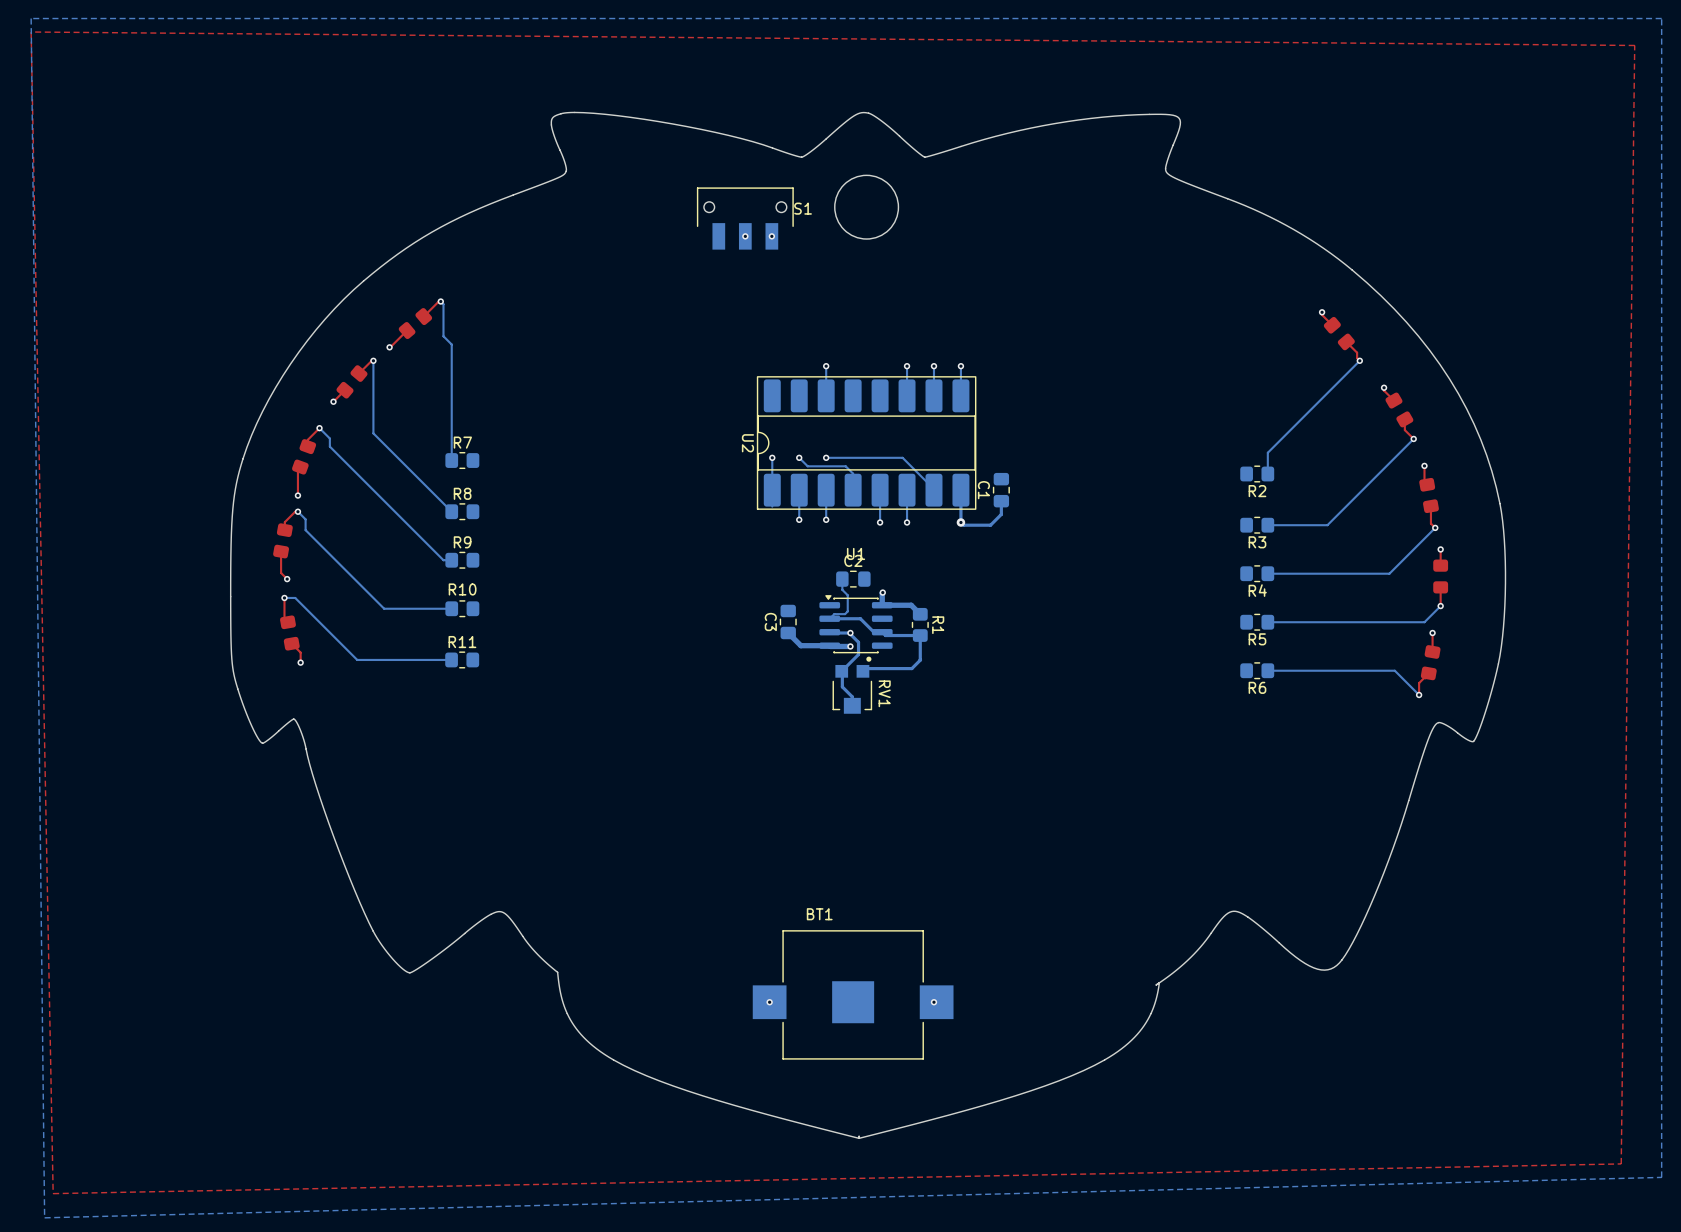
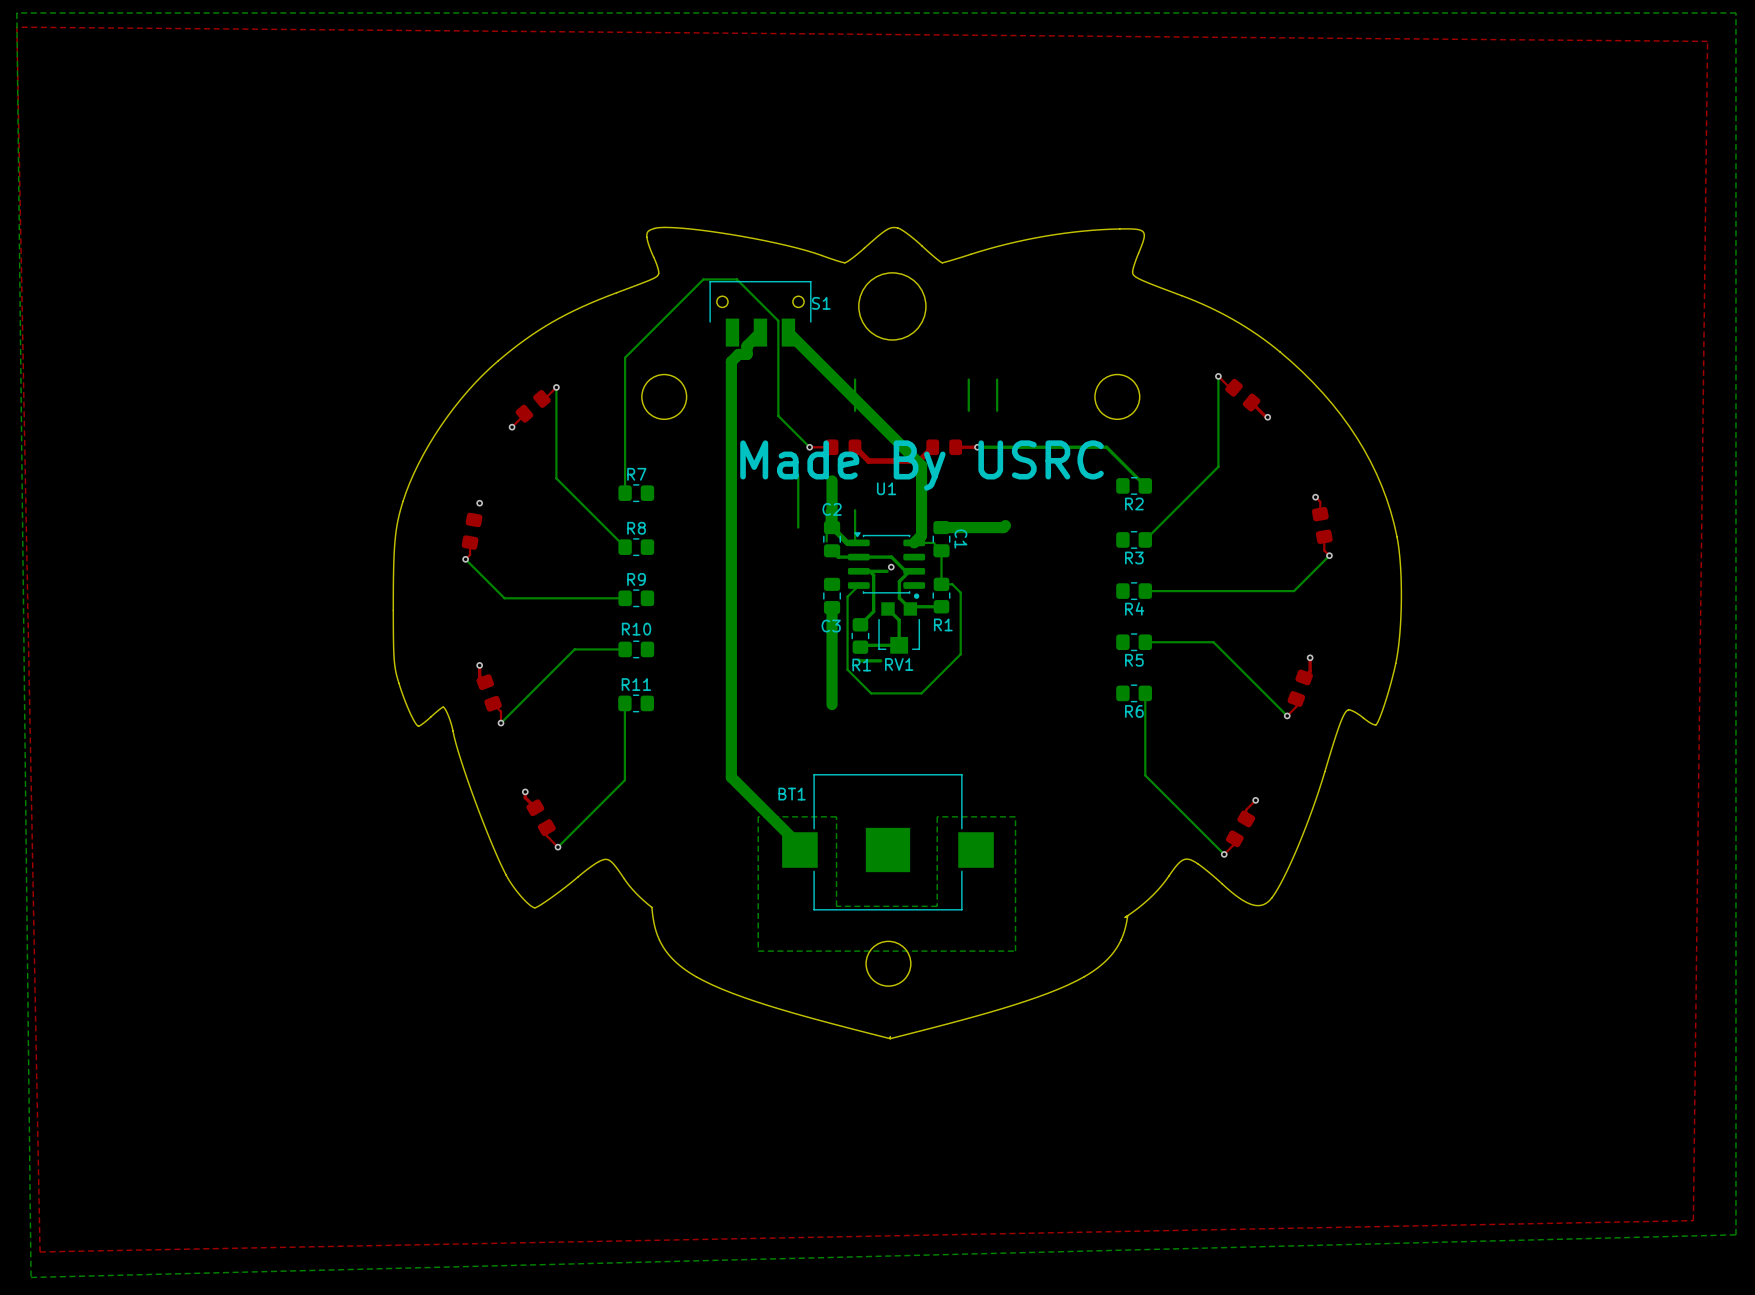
board edge: (574, 112) (617, 115) (687, 126) (741, 138) (801, 157) (849, 118) (861, 112) (869, 113) (879, 119) (924, 157) (995, 136) (1055, 123) (1114, 116) (1172, 115) (1179, 118) (1180, 124) (1166, 165) (1165, 170) (1168, 174) (1261, 212) (1309, 238) (1352, 270) (1406, 322) (1429, 350) (1458, 393) (1480, 439) (1491, 471) (1499, 503) (1504, 539) (1505, 594) (1502, 637) (1492, 688) (1475, 737) (1473, 741) (1469, 740) (1440, 722) (1434, 726) (1379, 884) (1352, 942) (1336, 965) (1324, 970) (1309, 965) (1295, 956) (1247, 917) (1237, 911) (1229, 912) (1221, 918) (1190, 957) (1156, 984) (1159, 982) (1154, 1004) (1146, 1022) (1131, 1040) (1109, 1057) (1071, 1075) (1015, 1095) (913, 1124) (859, 1138) (859, 1136) (858, 1138) (751, 1110) (687, 1090) (646, 1075) (608, 1057) (589, 1043) (576, 1028) (563, 1003) (557, 972) (533, 950) (510, 918) (503, 912) (496, 911) (485, 917) (435, 956) (410, 972) (404, 970) (392, 958) (373, 931) (349, 877) (319, 797) (303, 739) (296, 722) (292, 719) (261, 742) (251, 726) (239, 693) (232, 667) (230, 635) (231, 534) (236, 482) (246, 447) (268, 399) (298, 352) (334, 308) (380, 266) (432, 232) (479, 208) (564, 174) (565, 165) (553, 134) (551, 120) (558, 114) (574, 112) -> (665, 227) (698, 229) (754, 238) (796, 248) (844, 262) (882, 232) (892, 227) (898, 228) (906, 232) (942, 262) (998, 246) (1045, 236) (1092, 230) (1138, 229) (1143, 232) (1144, 237) (1133, 269) (1134, 276) (1208, 306) (1246, 327) (1280, 352) (1323, 393) (1341, 415) (1364, 449) (1381, 486) (1390, 511) (1397, 536) (1400, 565) (1401, 608) (1399, 642) (1391, 682) (1377, 721) (1375, 724) (1373, 724) (1350, 710) (1344, 713) (1301, 837) (1280, 883) (1267, 901) (1258, 905) (1246, 902) (1197, 863) (1189, 859) (1183, 859) (1152, 895) (1125, 917) (1127, 915) (1124, 932) (1117, 947) (1105, 961) (1088, 974) (1058, 989) (1013, 1005) (890, 1038) (754, 1001) (722, 989) (692, 974) (677, 963) (666, 951) (656, 931) (651, 907) (632, 889) (608, 860) (603, 859) (595, 863) (535, 907) (531, 905) (521, 896) (506, 874) (487, 832) (463, 769) (445, 709) (442, 707) (417, 725) (410, 712) (400, 687) (394, 666) (393, 640) (393, 561) (397, 520) (406, 492) (423, 454) (447, 416) (475, 382) (511, 349) (552, 322) (590, 303) (657, 276) (658, 269) (648, 244) (646, 233) (652, 229) (665, 227)
round board edge position: (866, 207) -> (892, 306)
S1 position: (745, 218) -> (760, 313)
via: (745, 236) -> none
via: (771, 236) -> none
top track: (440, 301) (423, 316) -> none
bottom track: (440, 301) (443, 304) (443, 336) (451, 344) (451, 460) -> none
via: (440, 301) -> none
top track: (1322, 312) (1322, 315) (1332, 325) -> none
via: (1322, 312) -> none
bottom track: none -> (760, 332) (747, 346) (747, 354) (738, 354) (731, 361) (731, 777) (799, 845) (799, 850)
bottom track: none -> (788, 332) (921, 465) (921, 535) (914, 542) (933, 542) (941, 550) (941, 584) (952, 584) (960, 592) (960, 654) (921, 693) (871, 693) (847, 669) (847, 596) (858, 585) (863, 585)
part position: (415, 323) -> (533, 406)
top track: (407, 330) (389, 347) -> none
part: (1339, 333) -> none
top track: (1346, 341) (1357, 352) (1357, 358) (1359, 360) -> none
via: (389, 347) -> none
top track: (373, 360) (358, 373) -> none
bottom track: (373, 360) (373, 433) (451, 511) -> none
via: (373, 360) -> none
bottom track: (1359, 360) (1267, 452) (1267, 473) -> none
via: (1359, 360) -> none
round board edge: none -> [641, 374, 687, 420]
round board edge: none -> [1094, 374, 1140, 420]
top track: none -> (1218, 376) (1229, 387) (1234, 387)
bottom track: none -> (1218, 376) (1218, 466) (1145, 539)
via: none -> (1218, 376)
via: (826, 366) -> none
bottom track: (907, 366) (907, 379) -> none
via: (907, 366) -> none
via: (933, 366) -> none
via: (960, 366) -> none
top track: none -> (556, 387) (544, 398) (541, 398)
bottom track: none -> (556, 387) (556, 478) (625, 547)
via: none -> (556, 387)
part: none -> (1242, 395)
part: (351, 381) -> none
top track: none -> (1251, 402) (1267, 417)
top track: (1384, 387) (1384, 390) (1393, 400) -> none
via: (1384, 387) -> none
top track: (345, 390) (333, 401) -> none
top track: none -> (524, 413) (512, 427)
via: (333, 401) -> none
via: none -> (1267, 417)
part: (1399, 409) -> none
via: none -> (512, 427)
top track: (1404, 419) (1404, 430) (1413, 438) -> none
top track: (319, 428) (307, 439) (307, 446) -> none
bottom track: (319, 428) (329, 438) (329, 446) (443, 560) (451, 560) -> none
via: (319, 428) -> none
bottom track: none -> (809, 447) (778, 415) (778, 320) (736, 279) (703, 279) (625, 357) (625, 493)
via: none -> (809, 447)
top track: none -> (832, 447) (809, 447)
part: none -> (843, 447)
top track: none -> (932, 447) (918, 461) (868, 461) (854, 447)
part: none -> (944, 447)
top track: none -> (977, 447) (955, 447)
bottom track: none -> (977, 447) (1106, 447) (1145, 485)
via: none -> (977, 447)
bottom track: (1413, 438) (1327, 525) (1267, 525) -> none
via: (1413, 438) -> none
U2: (866, 443) -> none
text: none -> Made By USRC (922, 465)
part: (304, 456) -> none
via: (772, 457) -> none
bottom track: (799, 457) (807, 466) (845, 466) (853, 473) (853, 490) -> none
via: (799, 457) -> none
bottom track: (826, 457) (902, 457) (933, 490) -> none
via: (826, 457) -> none
R7 position: (462, 460) -> (636, 493)
bottom track: none -> (832, 480) (832, 527) (847, 542) (858, 542)
top track: (1424, 465) (1424, 482) (1427, 484) -> none
via: (1424, 465) -> none
top track: (300, 467) (297, 469) (297, 495) -> none
R2 position: (1257, 473) -> (1134, 485)
top track: none -> (1315, 497) (1320, 501) (1320, 514)
via: none -> (1315, 497)
via: none -> (479, 503)
bottom track: (960, 490) (960, 522) (963, 525) (990, 525) (1001, 514) (1001, 501) -> none
C1 name position: C1 (983, 490) -> C1 (960, 538)
C1 position: (1001, 490) -> (941, 539)
via: (297, 495) -> none
part position: (1429, 495) -> (1322, 525)
bottom track: none -> (1005, 525) (1003, 527) (941, 527)
bottom track: (880, 506) (880, 522) -> none
bottom track: (907, 506) (907, 522) -> none
top track: (1430, 506) (1430, 523) (1435, 527) -> none
top track: (297, 511) (295, 511) (284, 522) (284, 530) -> none
bottom track: (297, 511) (305, 519) (305, 530) (384, 608) (451, 608) -> none
via: (297, 511) -> none
R8 position: (462, 511) -> (636, 547)
top track: none -> (1324, 536) (1324, 550) (1329, 555)
via: (799, 519) -> none
via: (826, 519) -> none
top track: none -> (470, 542) (470, 554) (465, 559)
via: (880, 522) -> none
via: (907, 522) -> none
via: (960, 522) -> none
R3 position: (1257, 525) -> (1134, 539)
bottom track: (1435, 527) (1389, 573) (1267, 573) -> none
via: (1435, 527) -> none
bottom track: none -> (832, 550) (838, 557) (891, 557) (905, 571) (914, 571)
bottom track: none -> (1329, 555) (1294, 591) (1145, 591)
via: none -> (1329, 555)
bottom track: none -> (465, 559) (504, 598) (625, 598)
via: none -> (465, 559)
part position: (282, 540) -> (472, 531)
via: none -> (891, 567)
bottom track: none -> (869, 571) (873, 575) (873, 611) (860, 624)
bottom track: none -> (887, 571) (858, 571)
bottom track: none -> (909, 571) (899, 581) (899, 598) (910, 608) (912, 606) (941, 606)
top track: (1440, 549) (1440, 565) -> none
via: (1440, 549) -> none
top track: (281, 551) (281, 573) (287, 579) -> none
R9 position: (462, 560) -> (636, 598)
R1: none -> (941, 595)
R4 position: (1257, 573) -> (1134, 591)
part: (1440, 576) -> none
via: (287, 579) -> none
bottom track: (842, 579) (842, 589) (847, 595) (847, 611) (845, 614) (834, 614) (829, 618) (860, 618) (873, 632) (882, 632) (885, 635) (920, 635) (920, 659) (911, 668) (869, 668) -> none
C2 rotation: 0° (853, 579) -> 90° clockwise (832, 539)
C2 position: (853, 579) -> (832, 539)
bottom track: none -> (832, 607) (832, 704)
bottom track: none -> (887, 608) (899, 620) (899, 645) (862, 645) (860, 647)
top track: (1440, 587) (1440, 606) -> none
bottom track: (882, 592) (882, 605) (911, 605) (920, 614) -> none
via: (882, 592) -> none
top track: (284, 597) (284, 618) (287, 622) -> none
bottom track: (284, 597) (295, 597) (357, 659) (451, 659) -> none
via: (284, 597) -> none
bottom track: (1440, 606) (1424, 622) (1267, 622) -> none
via: (1440, 606) -> none
R10 position: (462, 608) -> (636, 649)
R1: none -> (860, 635)
bottom track: none -> (1145, 642) (1213, 642) (1287, 715)
C3 name rotation: 0° (770, 621) -> 90° counterclockwise (831, 626)
C3 name position: C3 (770, 621) -> C3 (831, 626)
C3 position: (788, 621) -> (832, 595)
bottom track: none -> (625, 649) (574, 649) (501, 723)
R5 position: (1257, 622) -> (1134, 642)
U1 position: (856, 624) -> (886, 562)
R1: (920, 624) -> none
top track: none -> (1310, 657) (1310, 671) (1304, 677)
via: none -> (1310, 657)
part: (289, 633) -> none
bottom track: (788, 633) (800, 645) (850, 646) -> none
bottom track: (849, 633) (858, 642) (858, 654) (842, 670) (842, 686) (852, 696) (852, 705) -> none
via: (850, 633) -> none
top track: (1432, 633) (1432, 651) -> none
via: (1432, 633) -> none
top track: none -> (479, 665) (479, 676) (485, 682)
via: none -> (479, 665)
top track: (291, 643) (300, 652) (300, 662) -> none
via: (850, 646) -> none
part: none -> (1300, 688)
R11 position: (462, 659) -> (636, 703)
via: (300, 662) -> none
part: (1430, 662) -> none
part: none -> (489, 692)
bottom track: none -> (1145, 693) (1145, 775) (1224, 854)
top track: none -> (1296, 698) (1296, 706) (1287, 715)
R6 position: (1257, 670) -> (1134, 693)
bottom track: (1267, 670) (1394, 670) (1419, 694) -> none
top track: none -> (493, 703) (501, 711) (501, 723)
bottom track: none -> (624, 703) (624, 780) (557, 847)
top track: (1425, 678) (1428, 673) (1419, 683) (1419, 694) -> none
RV1 position: (852, 685) -> (899, 623)
via: none -> (1287, 715)
via: none -> (501, 723)
RV1 name rotation: 0° (884, 693) -> 90° counterclockwise (899, 664)
RV1 name position: RV1 (884, 693) -> RV1 (899, 664)
via: (1419, 694) -> none
top track: none -> (525, 791) (525, 797) (535, 807)
via: none -> (525, 791)
top track: none -> (1255, 800) (1246, 809) (1246, 818)
via: none -> (1255, 800)
bottom zone outline: none -> (1015, 816) (937, 816) (937, 906) (836, 906) (836, 816) (758, 816) (758, 951) (1015, 951) (1015, 816)
part: none -> (541, 817)
top track: none -> (546, 827) (546, 835) (557, 847)
part: none -> (1240, 828)
top track: none -> (1234, 838) (1234, 843) (1224, 854)
via: none -> (557, 847)
via: none -> (1224, 854)
round board edge: none -> [865, 941, 912, 987]
BT1 name position: BT1 (819, 914) -> BT1 (792, 794)
BT1 position: (853, 994) -> (887, 842)
via: (769, 1002) -> none
via: (933, 1002) -> none

